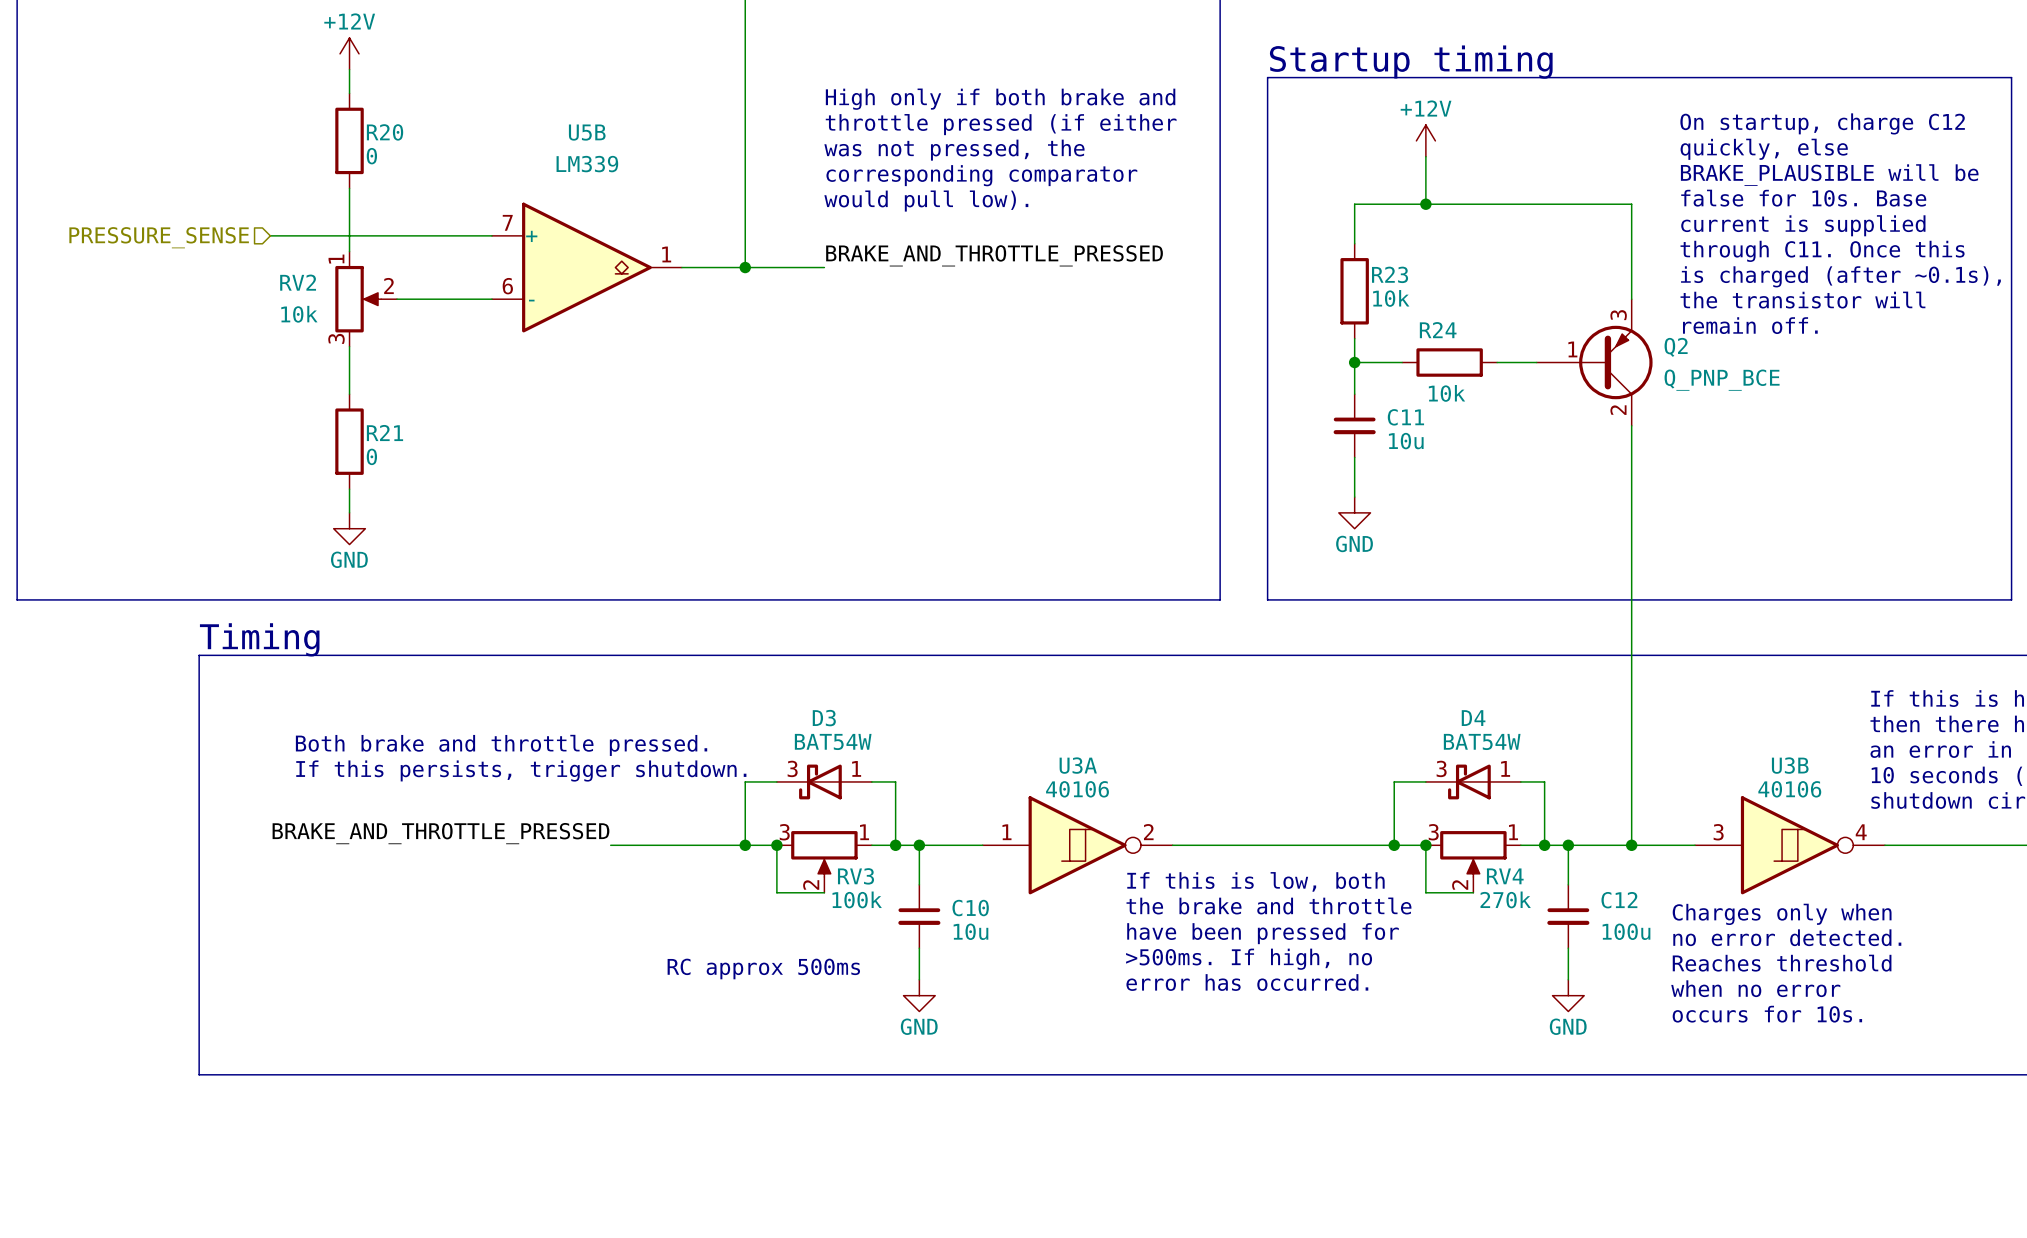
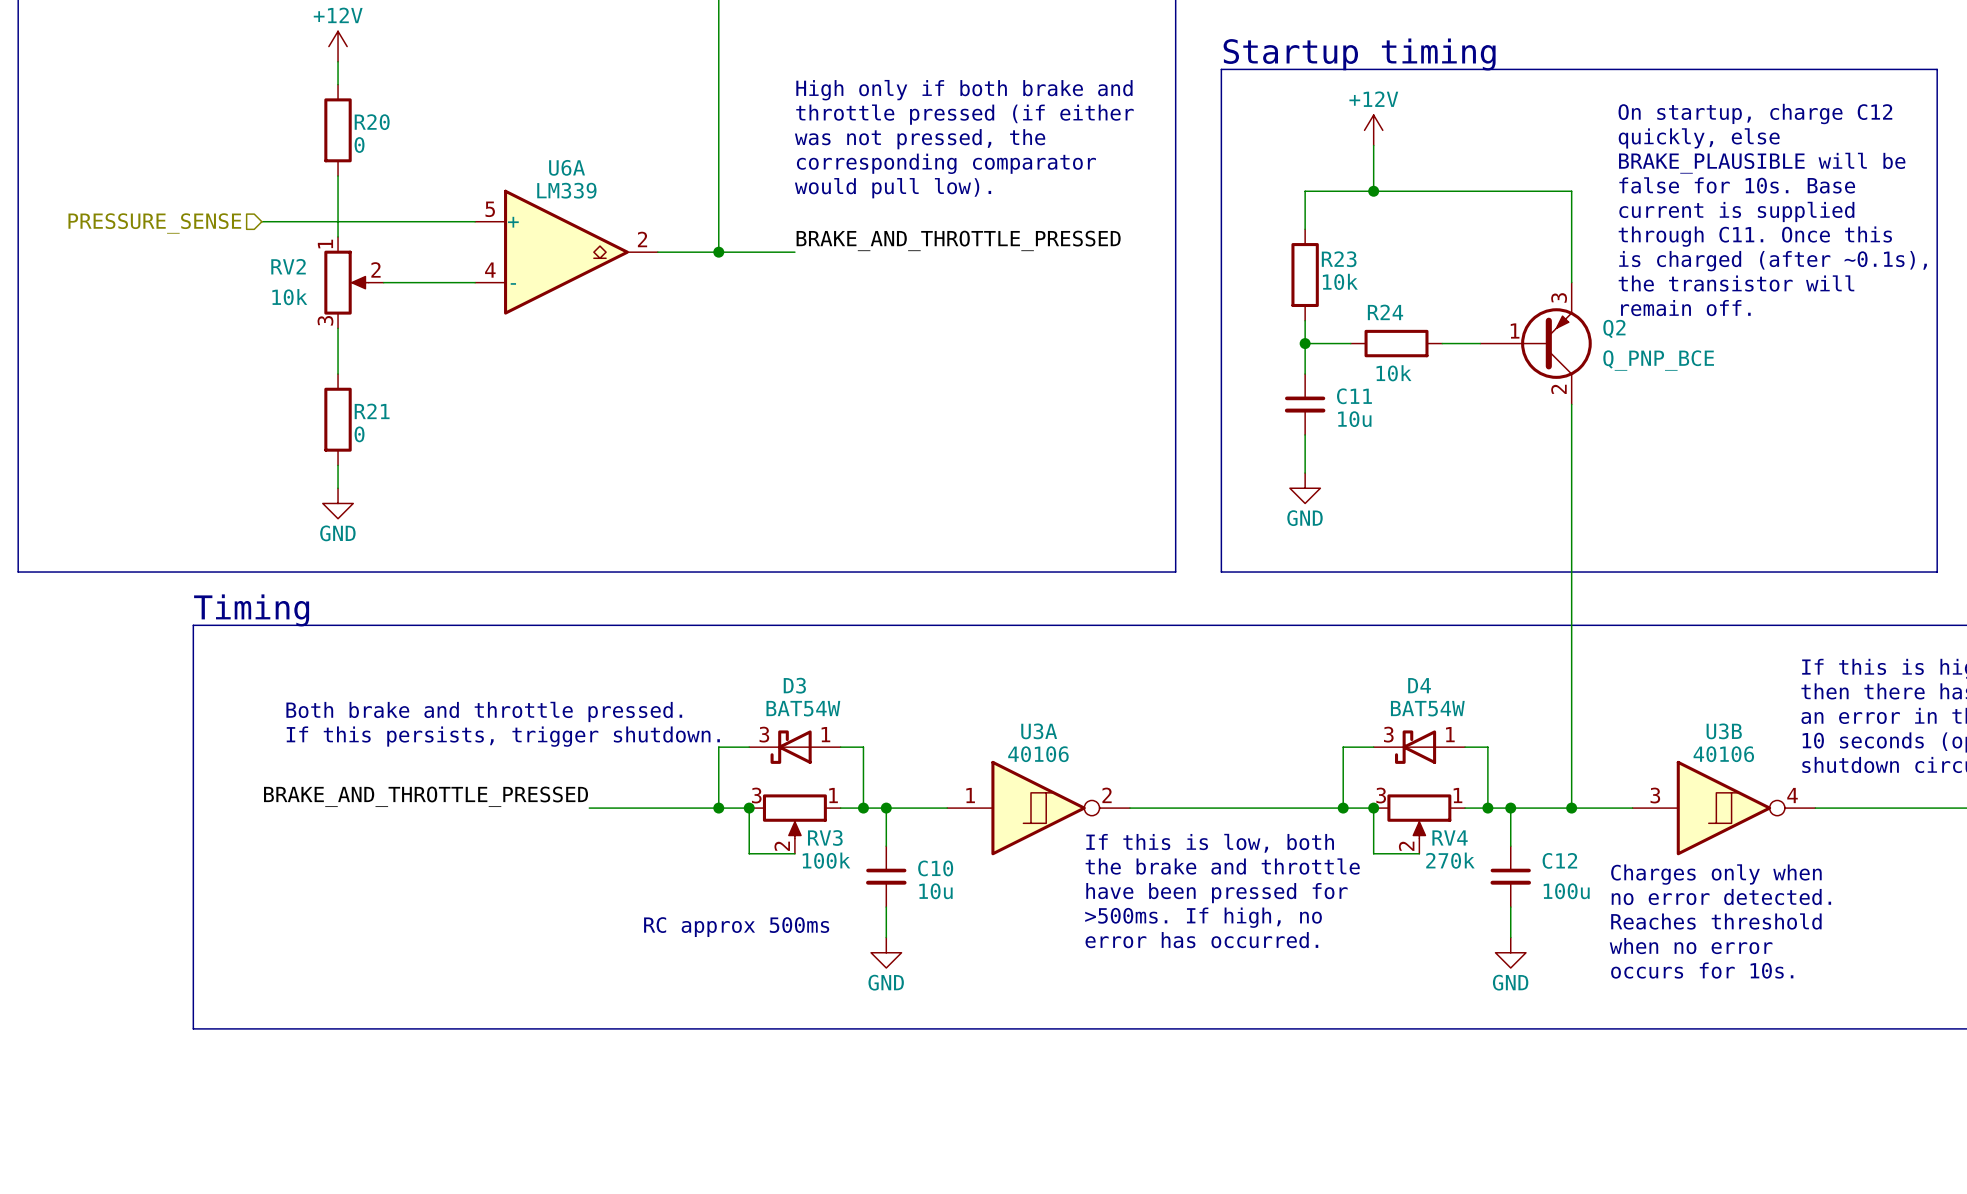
U5B name: U5B (587, 132) -> U6A (567, 167)
U5B value position: LM339 (587, 164) -> LM339 (566, 190)
U5B pin number: 7 (507, 222) -> 5 (490, 209)
U5B pin number: 1 (666, 254) -> 2 (642, 239)
U5B pin number: 6 (507, 286) -> 4 (490, 270)

